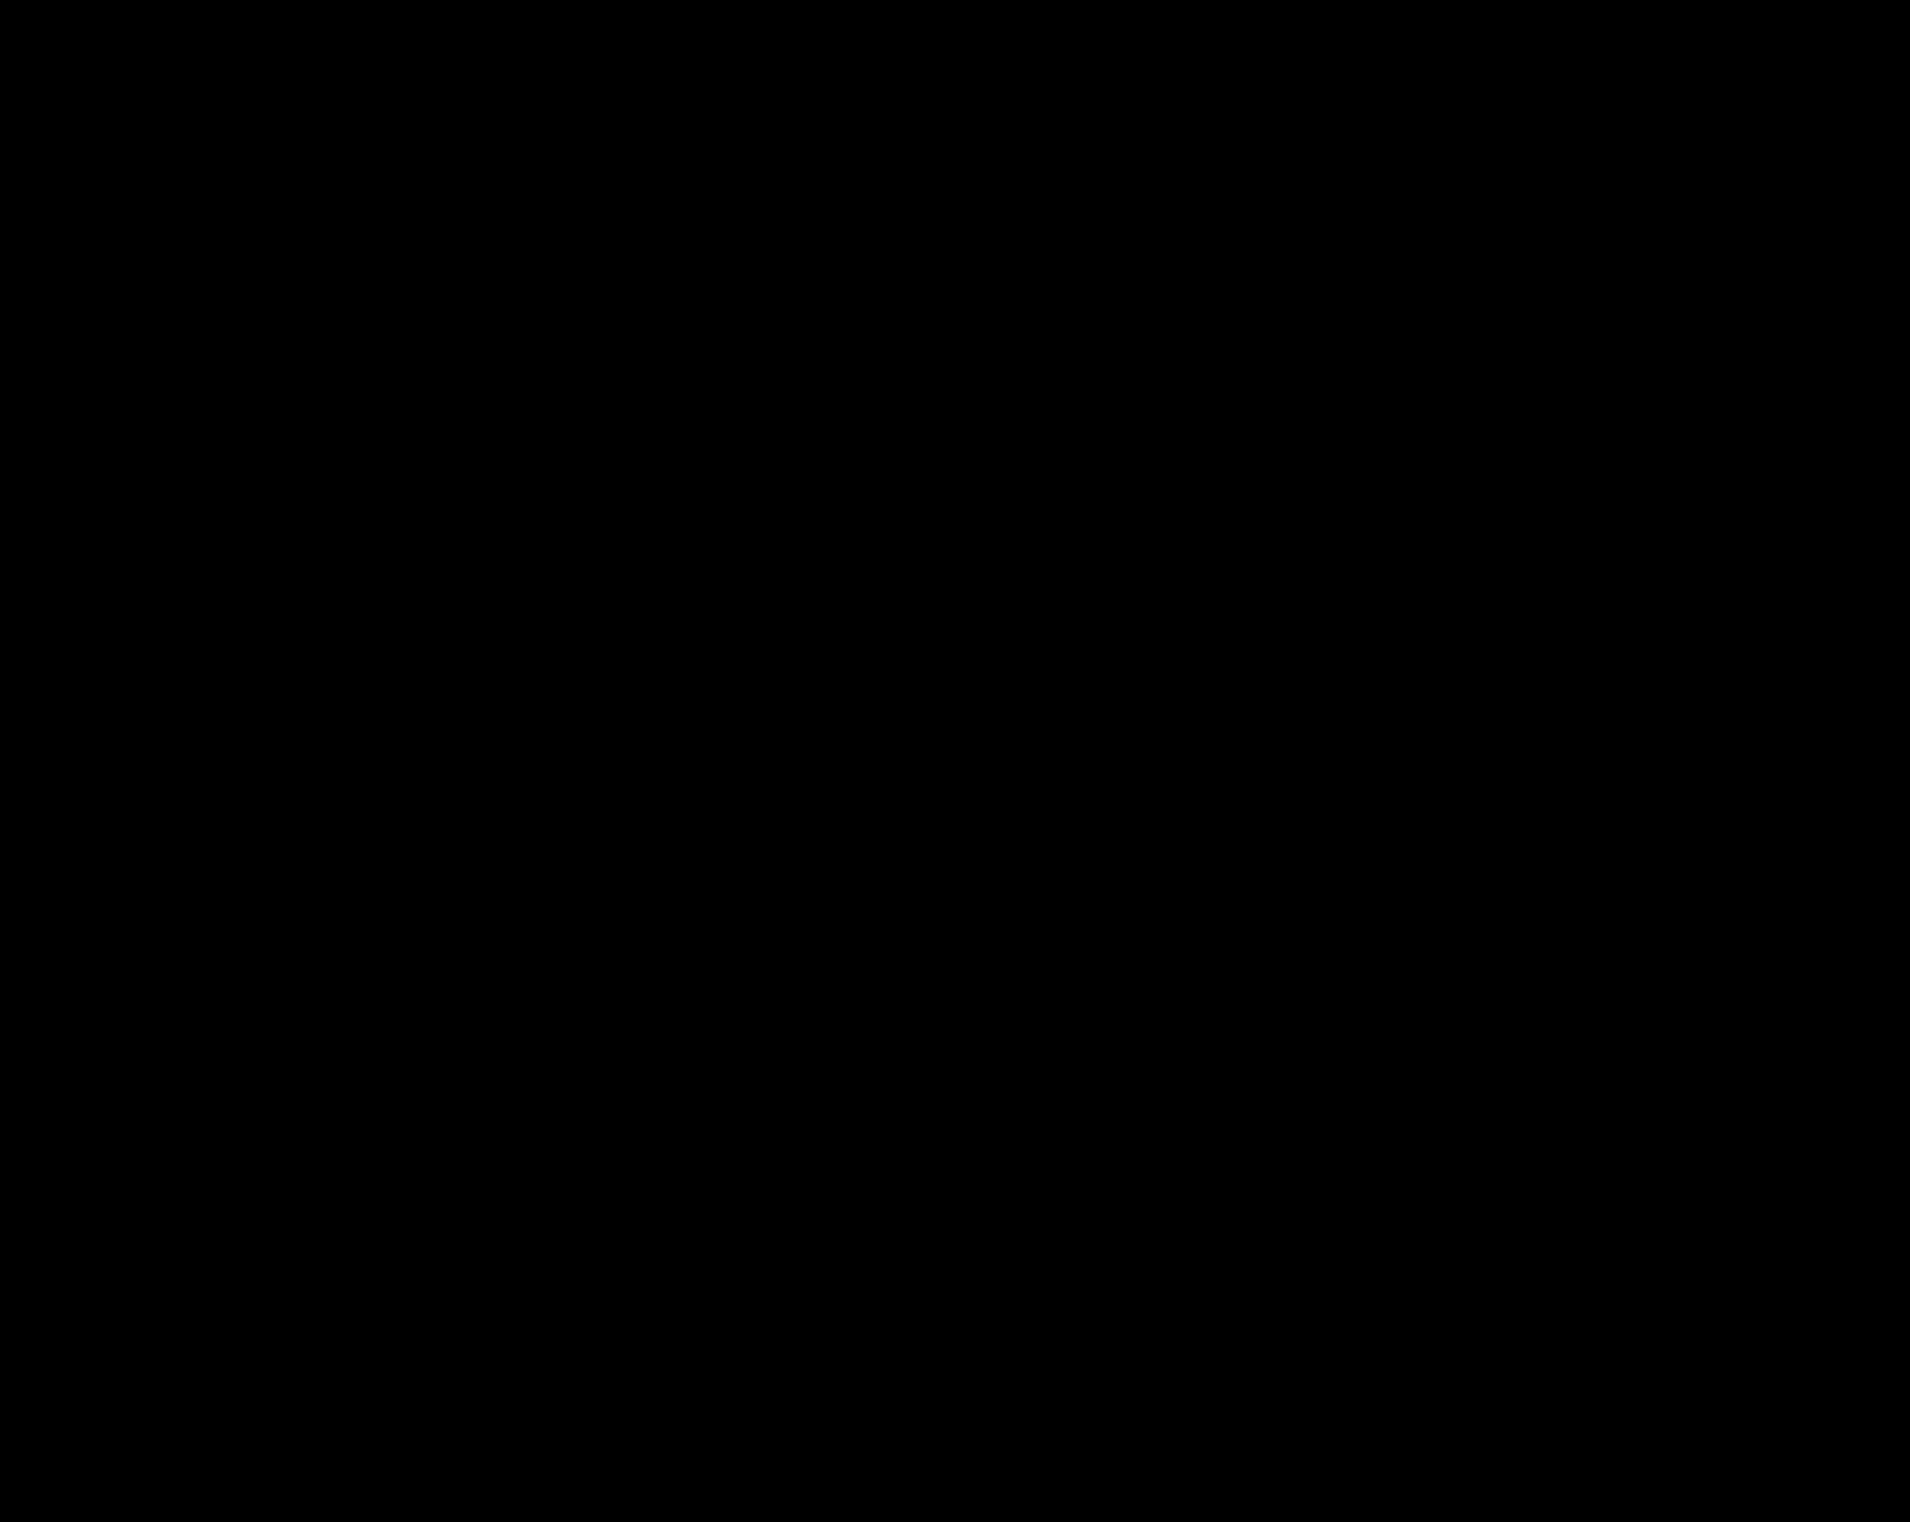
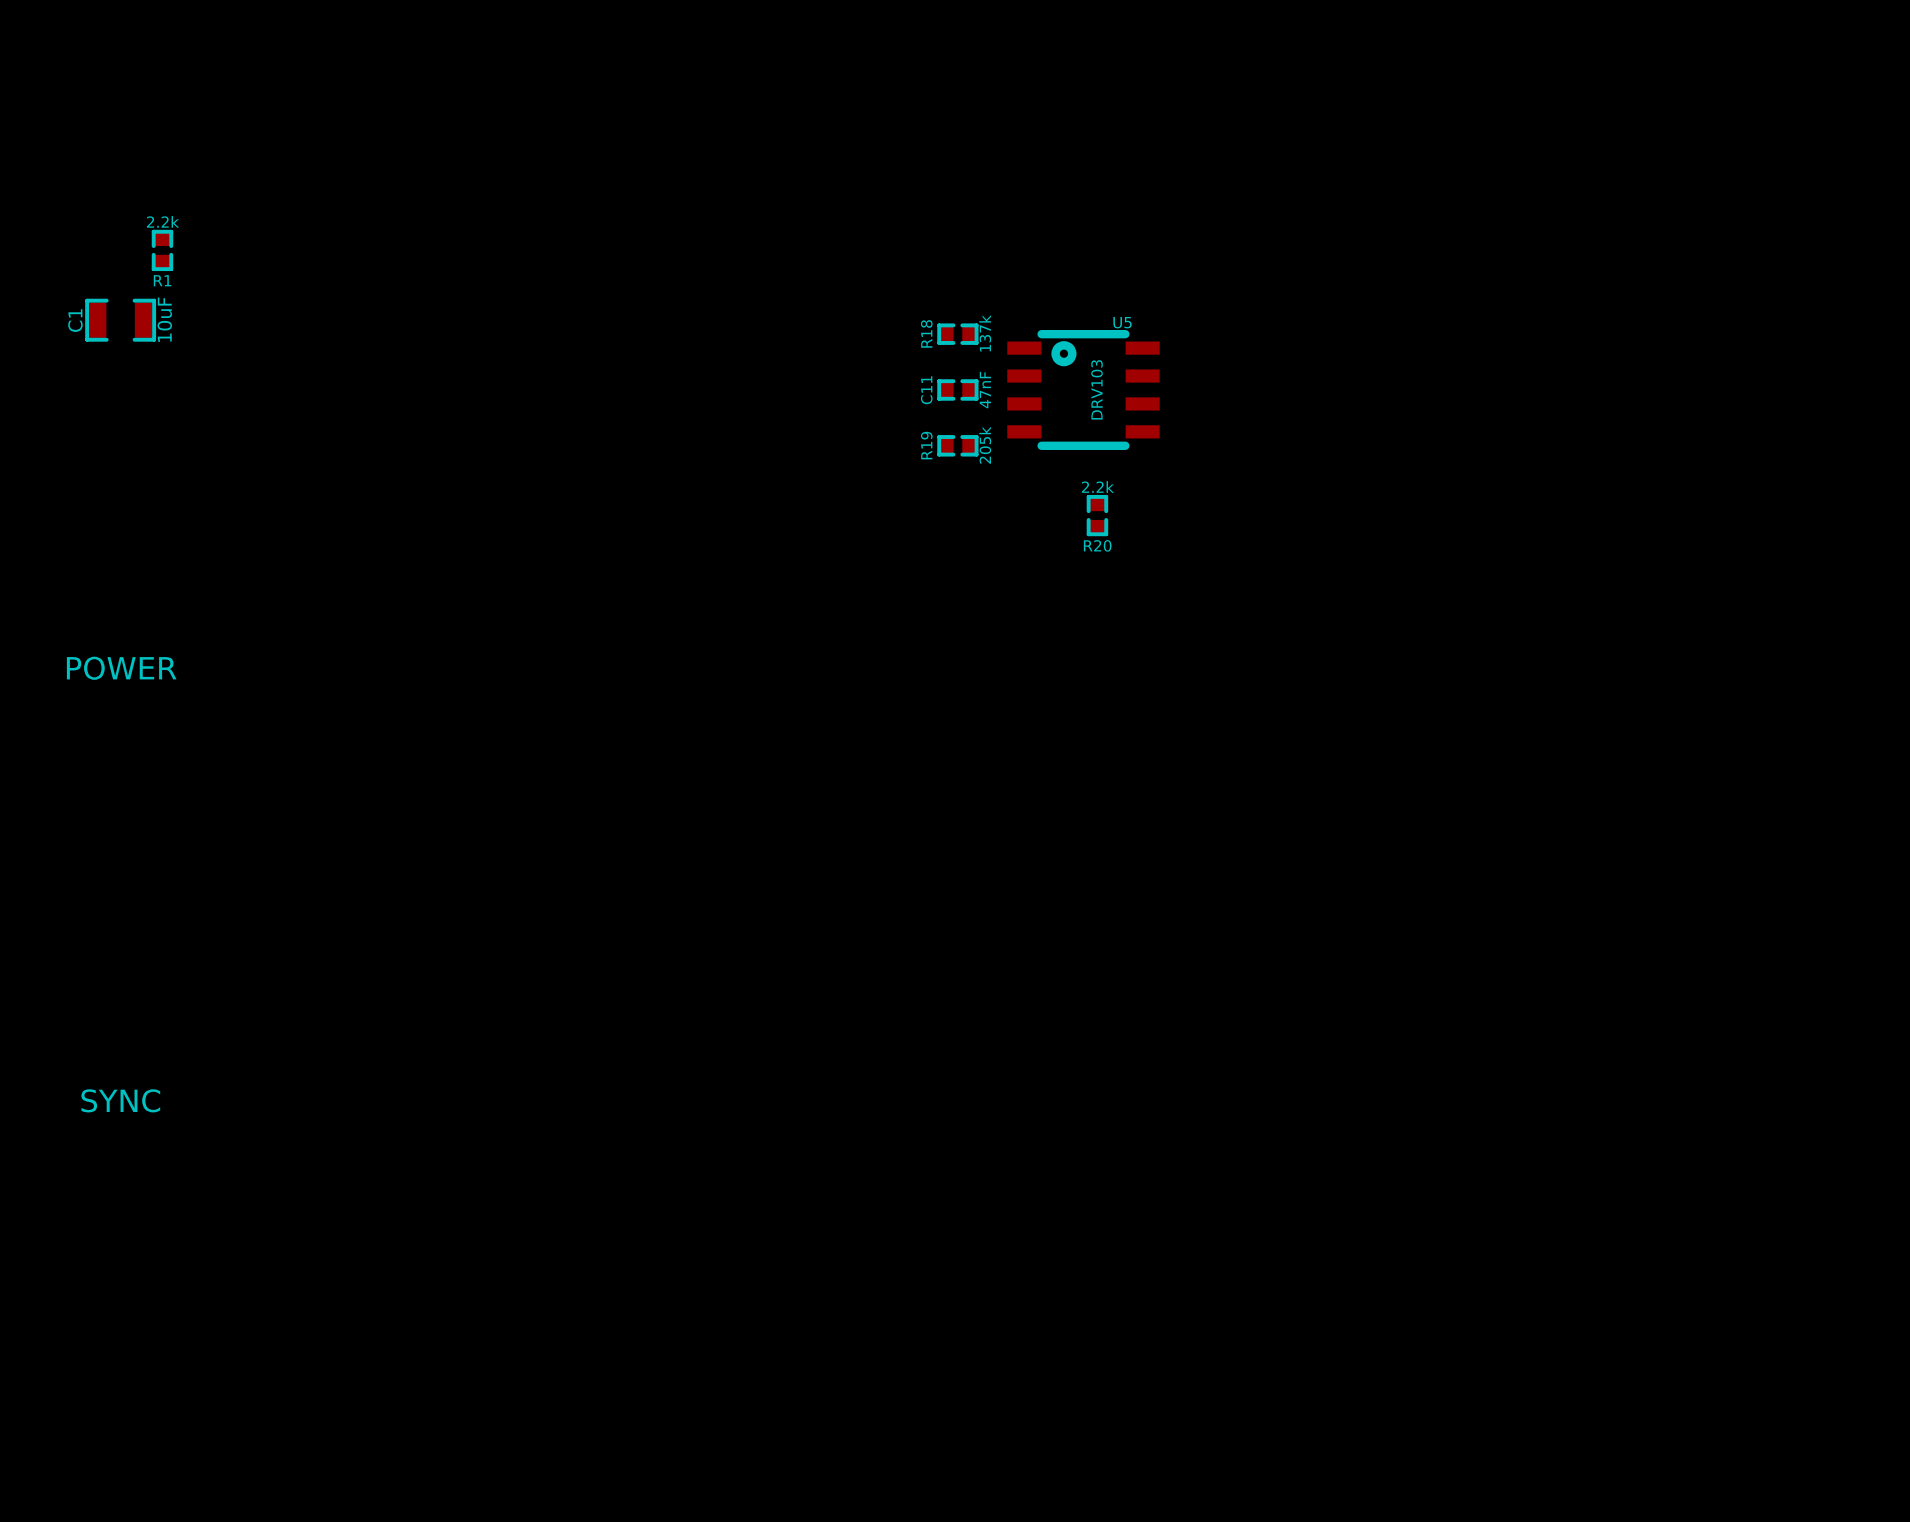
R1: none -> 2.2k (162, 250)
C1: none -> 10uF (120, 320)
R18: none -> 137k (957, 334)
C11: none -> 47nF (957, 389)
U5: none -> DRV103 (1083, 389)
R19: none -> 205k (957, 445)
R20: none -> 2.2k (1097, 515)
text: none -> POWER (121, 668)
text: none -> SYNC (120, 1100)

